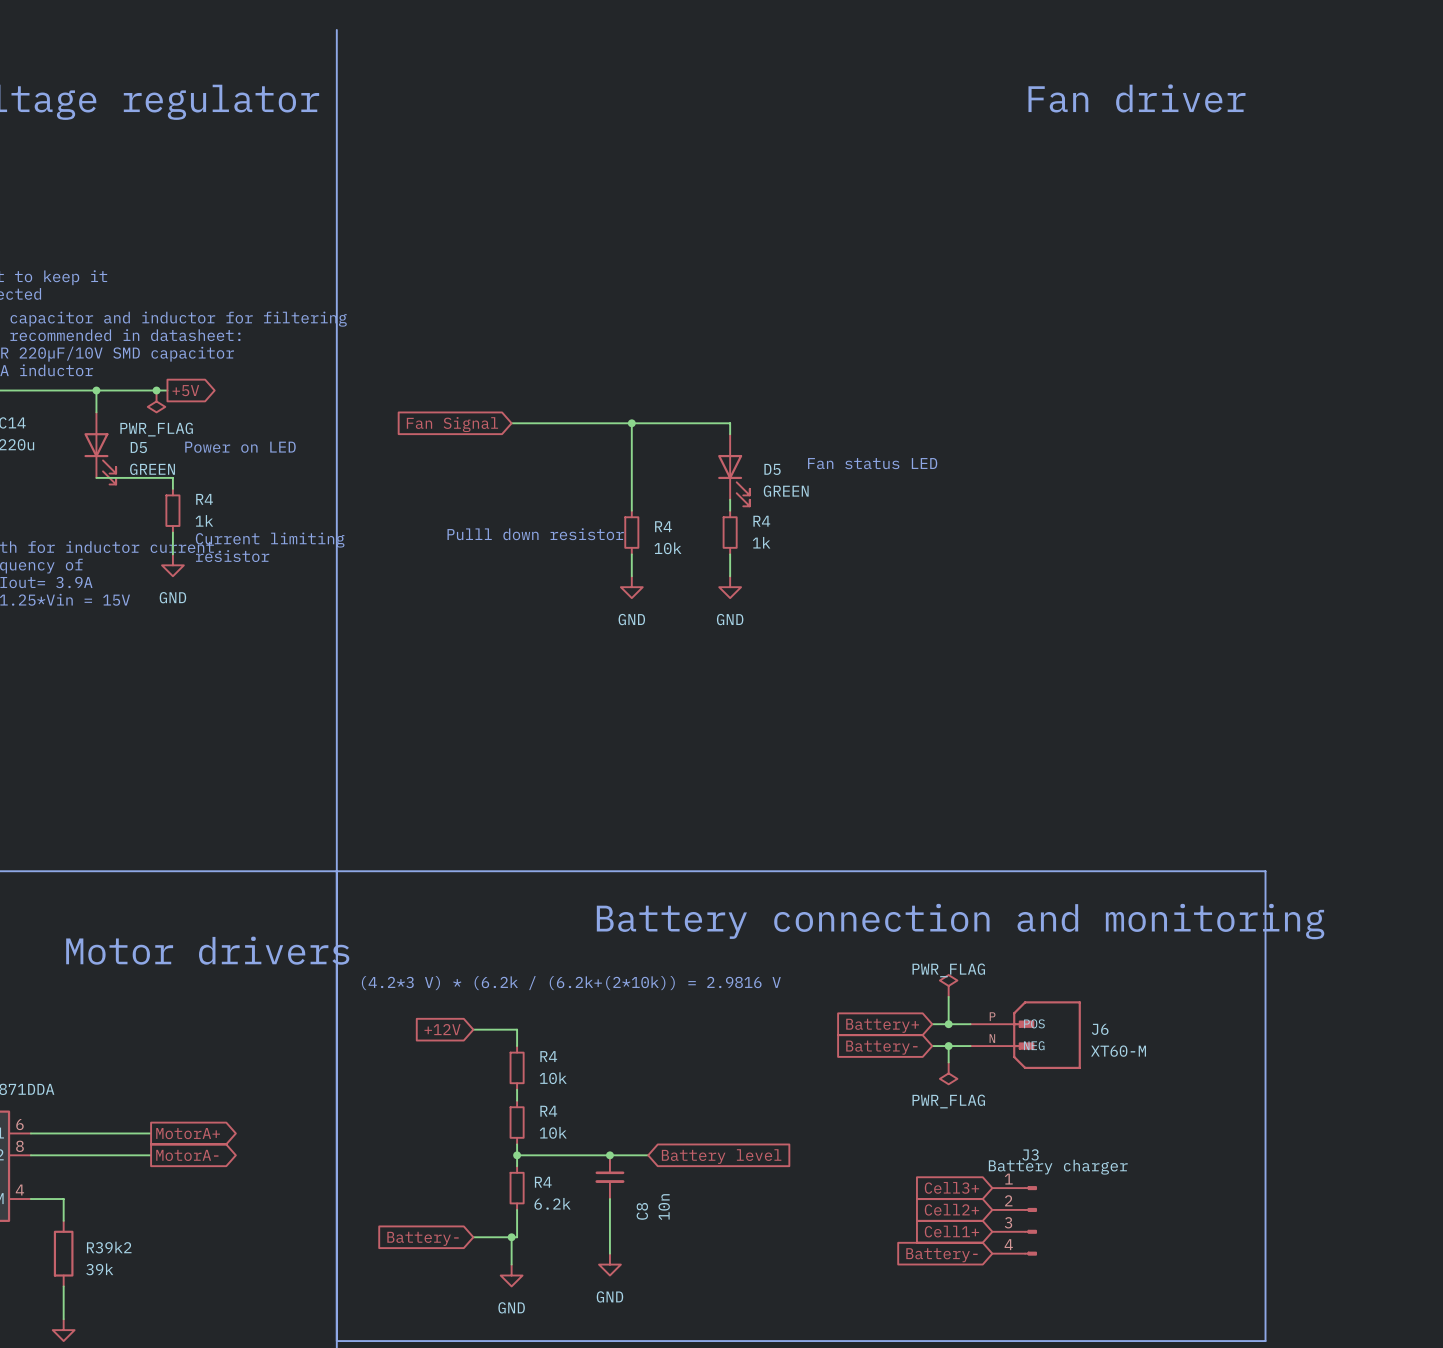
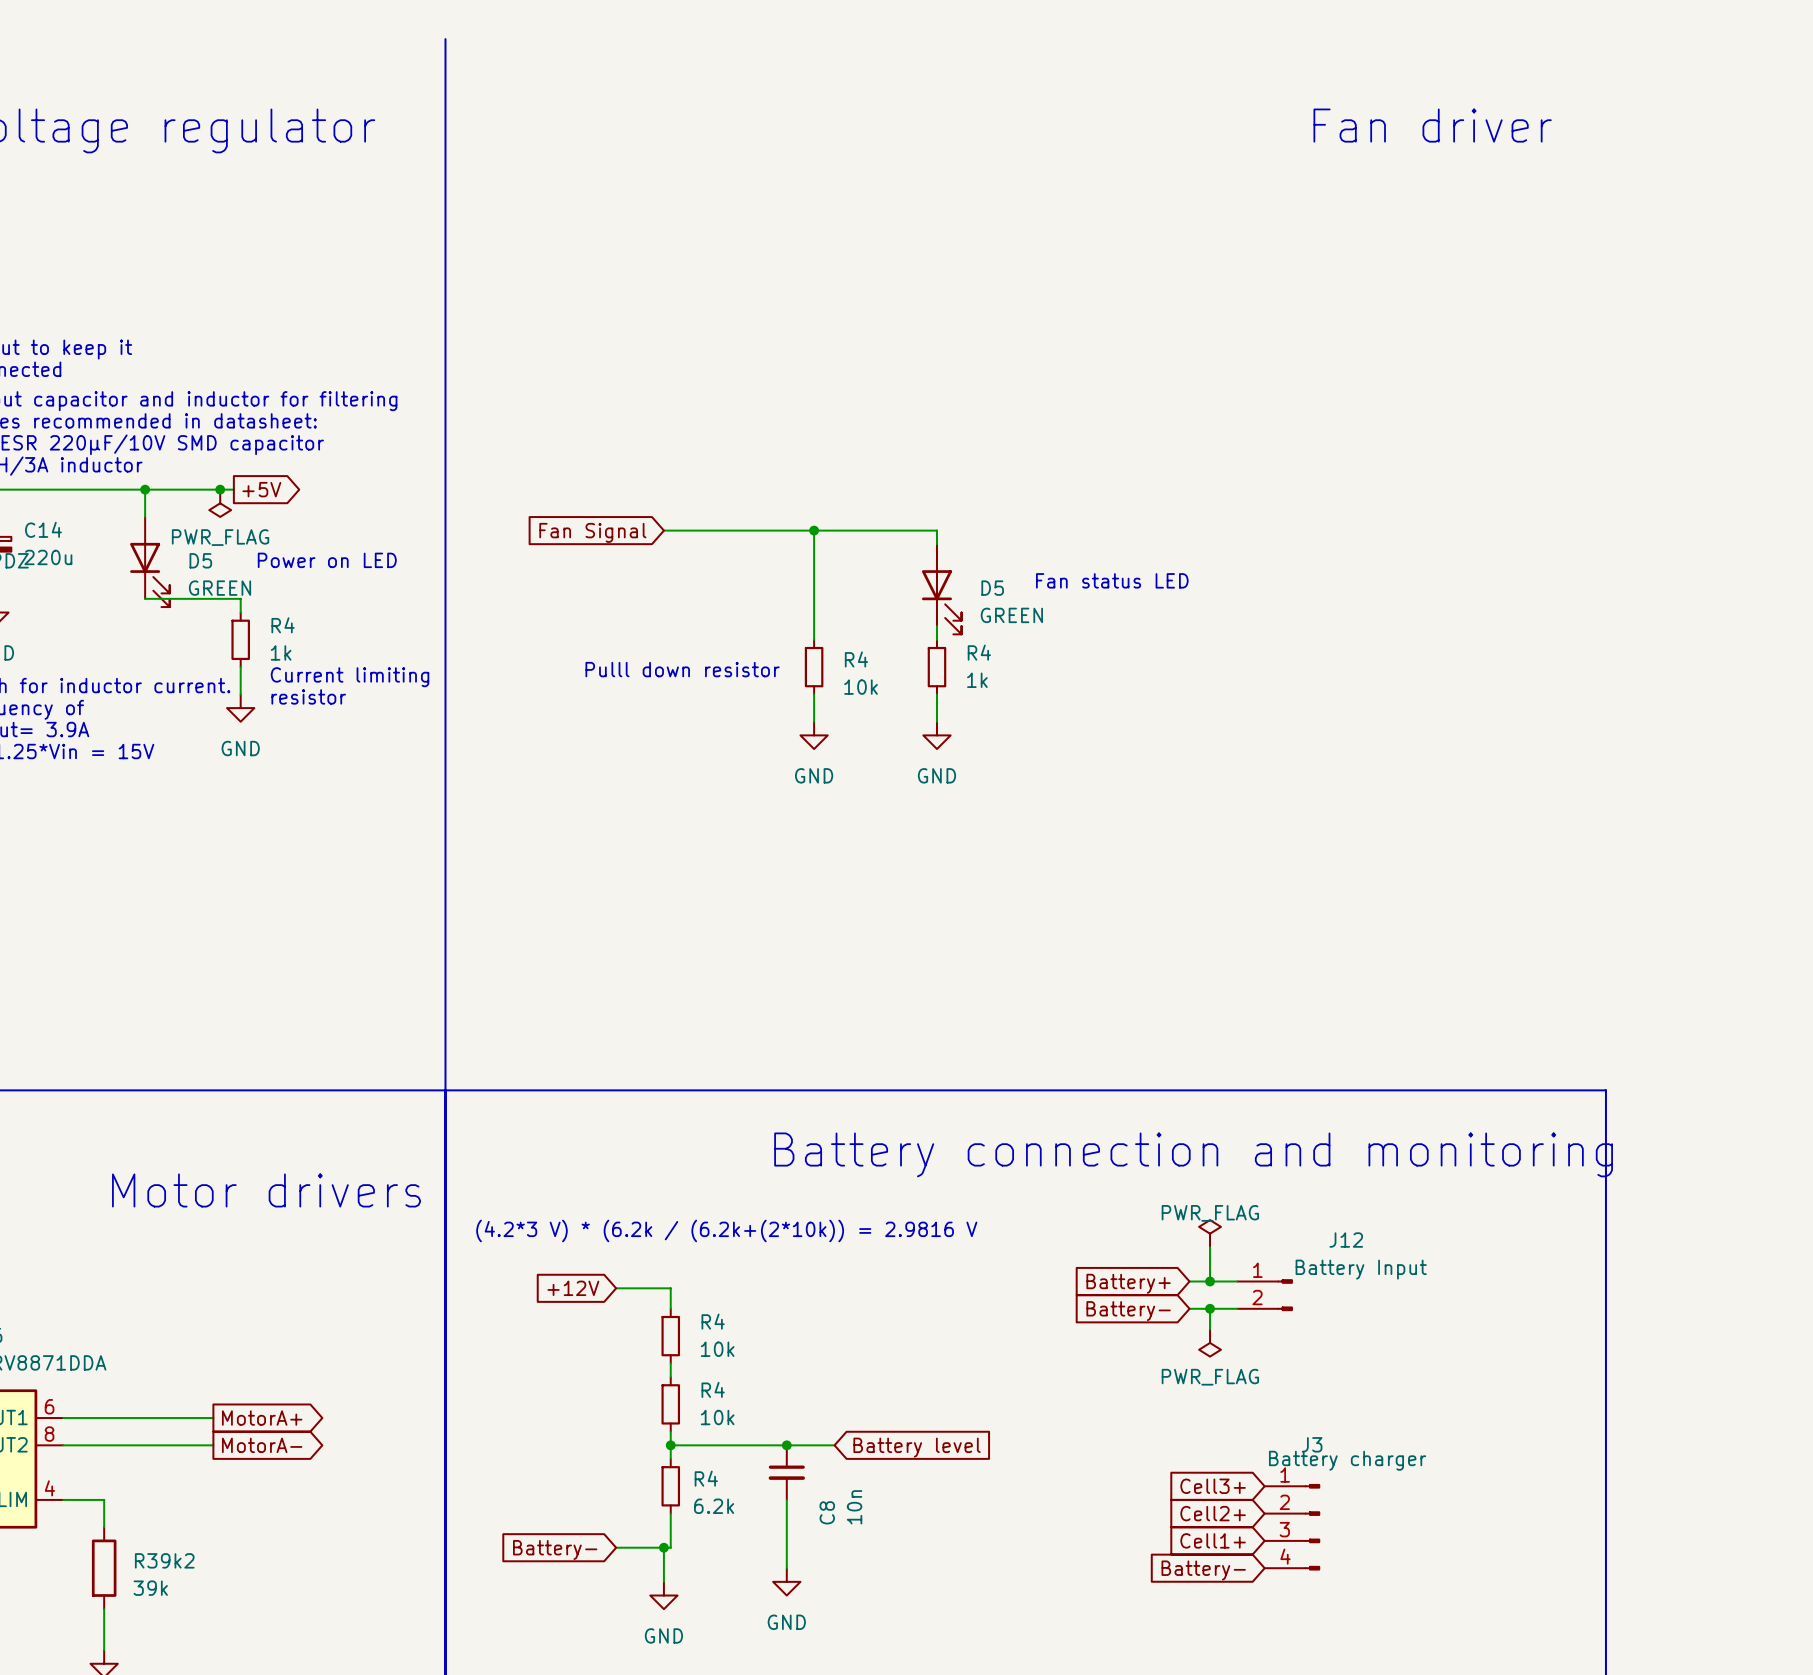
J12: none -> Battery Input (1265, 1295)
J6: XT60-M (1025, 1035) -> none

